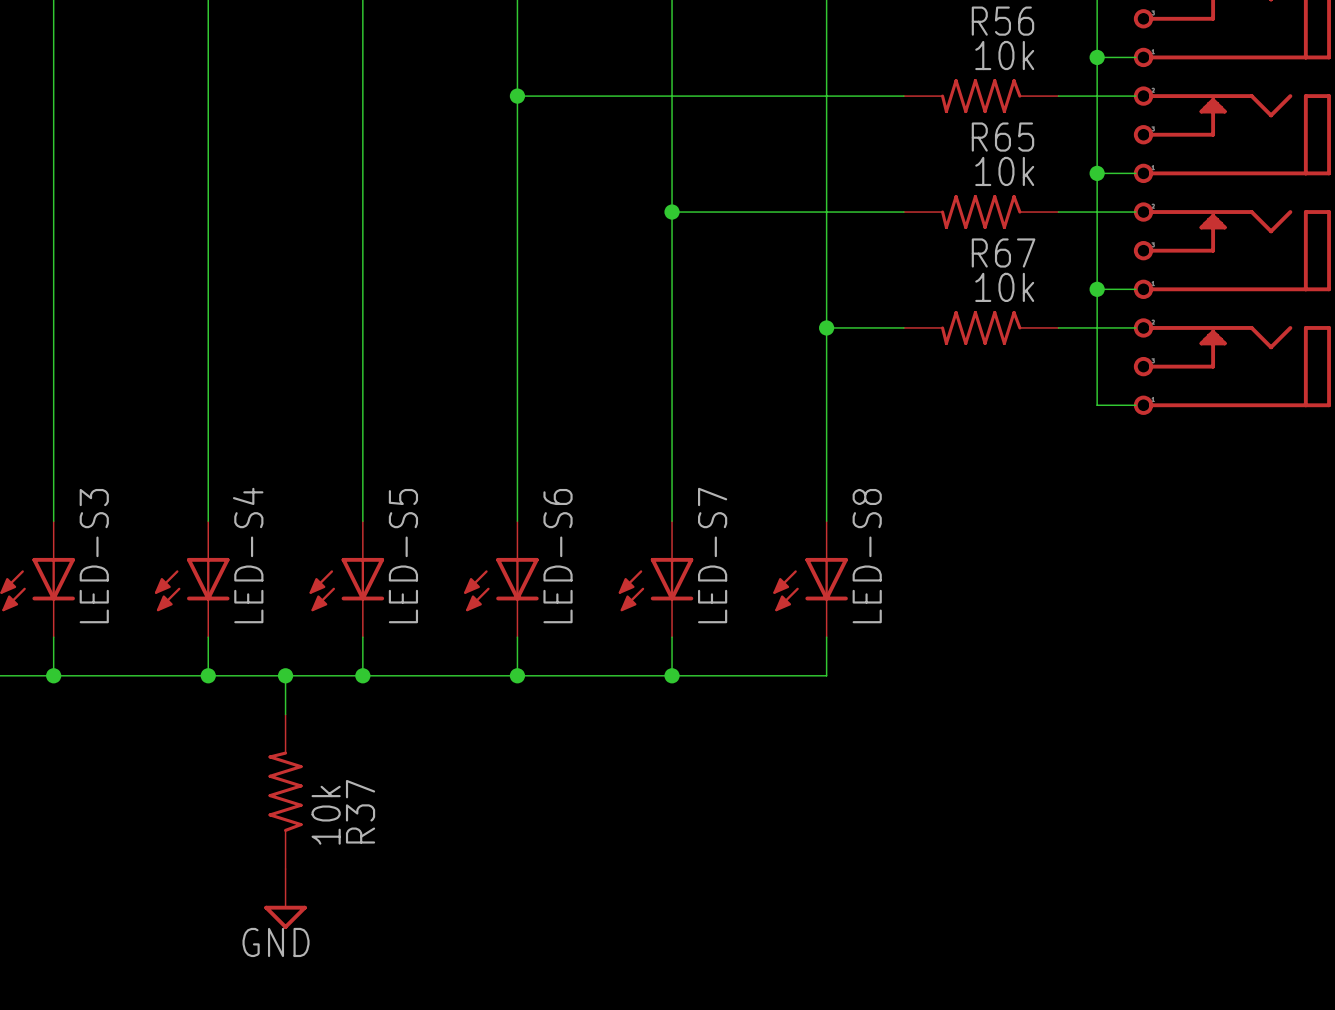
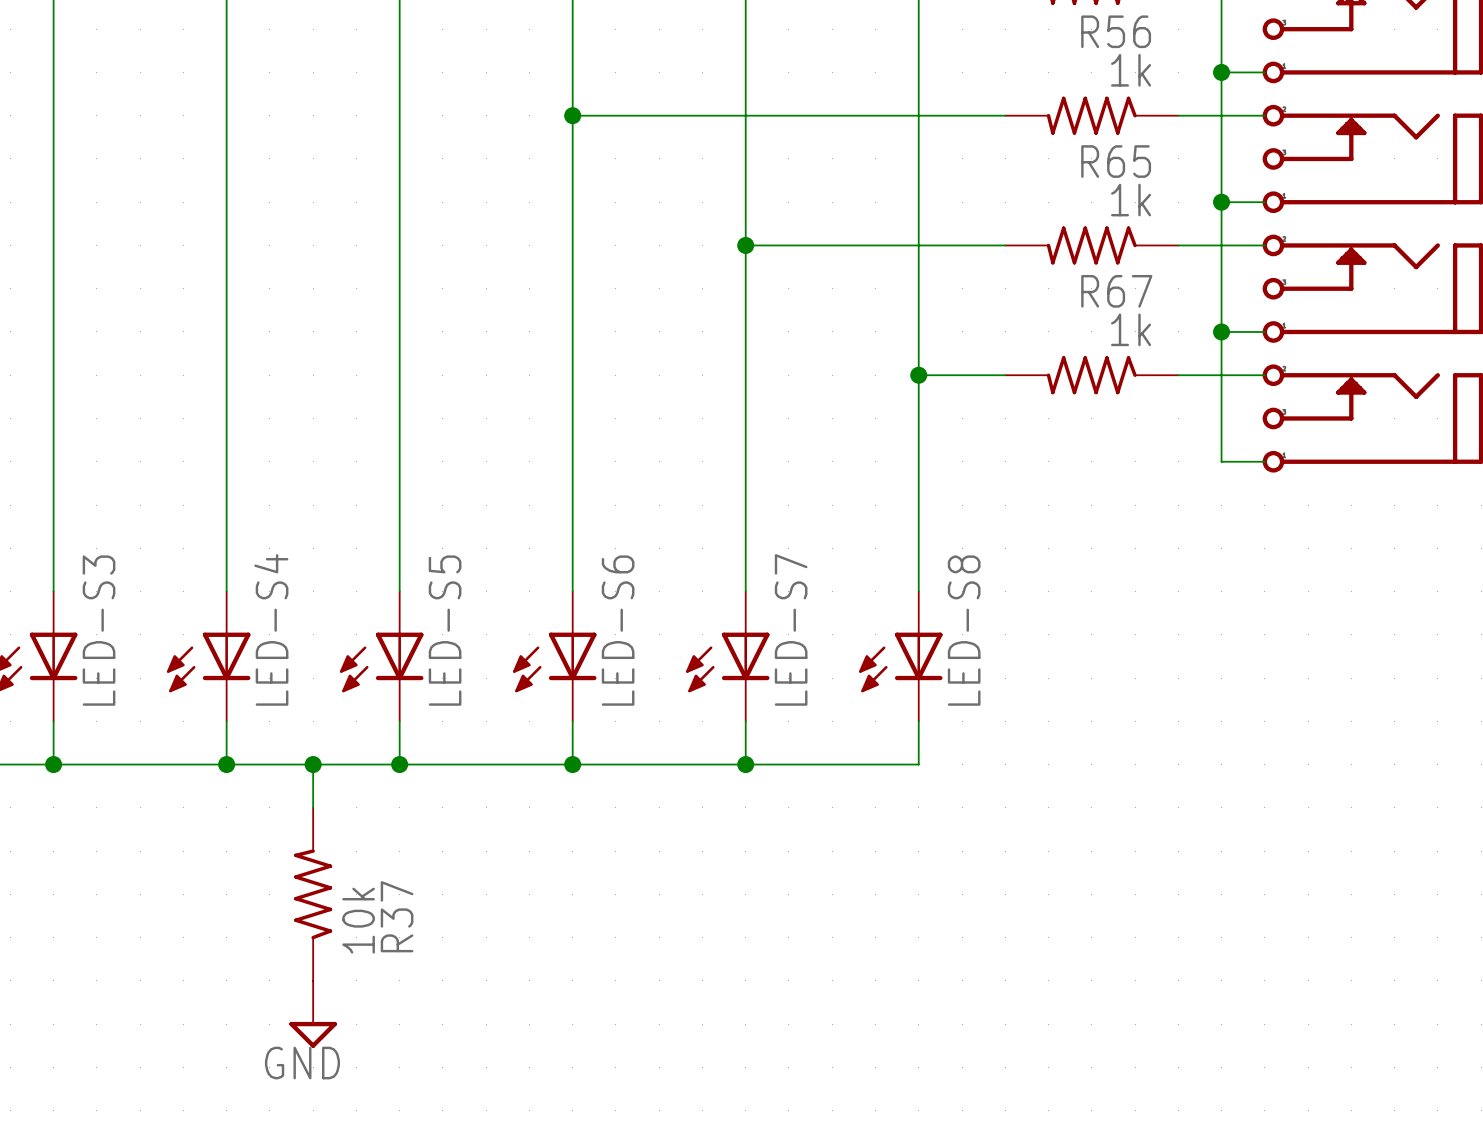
R56 value: 10k (1004, 55) -> 1k (1131, 70)
R65 value: 10k (1004, 171) -> 1k (1131, 200)
R67 value: 10k (1004, 287) -> 1k (1131, 329)

